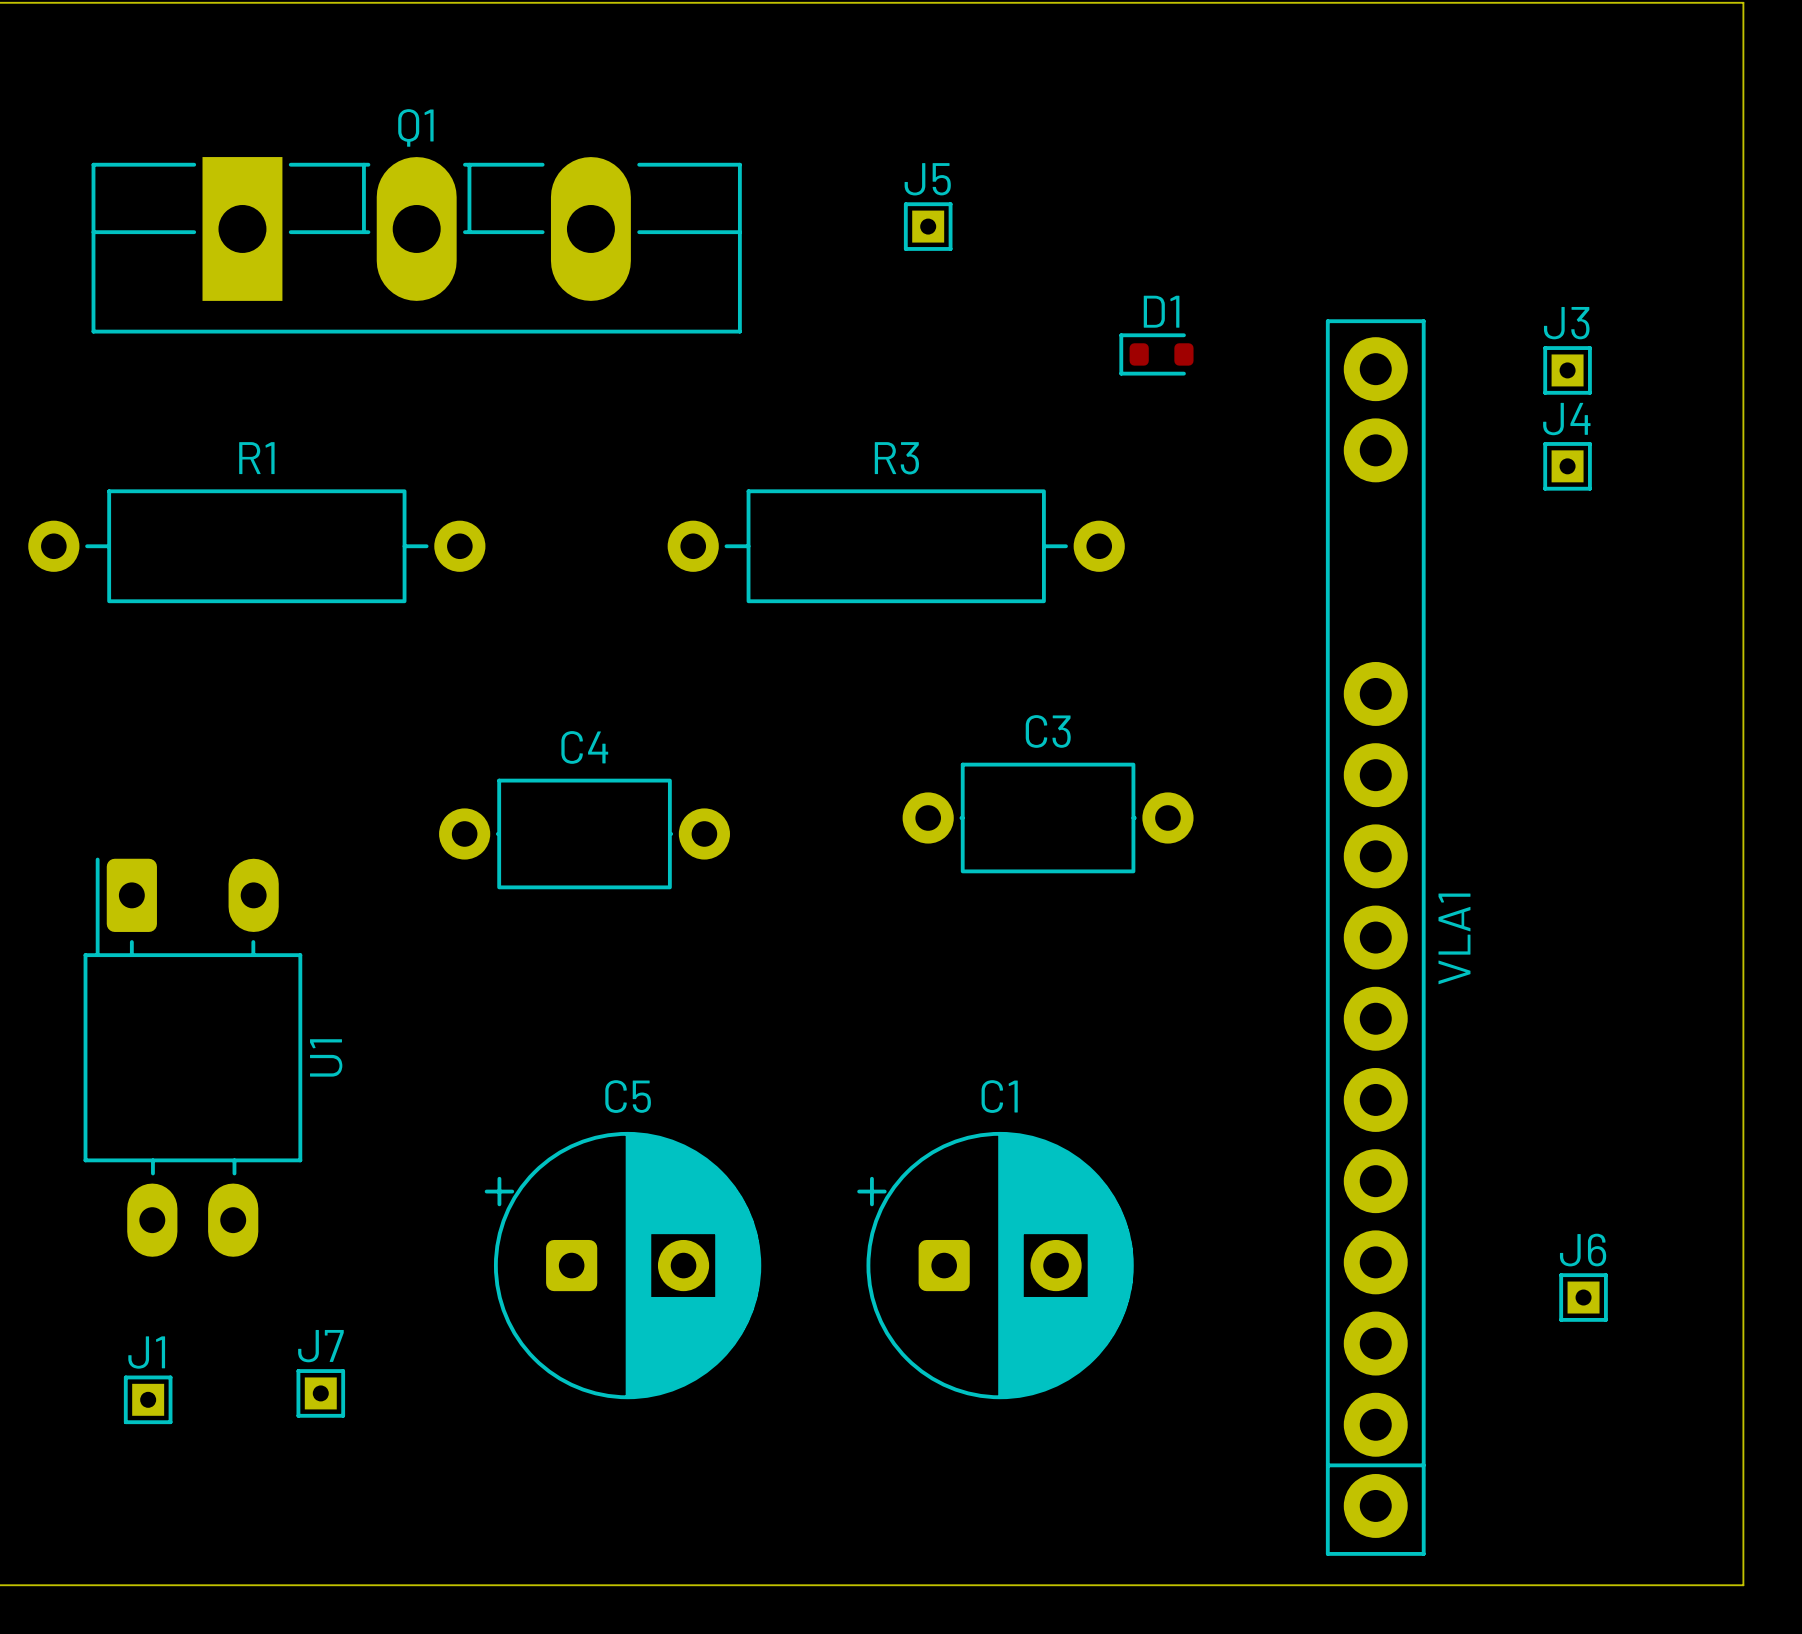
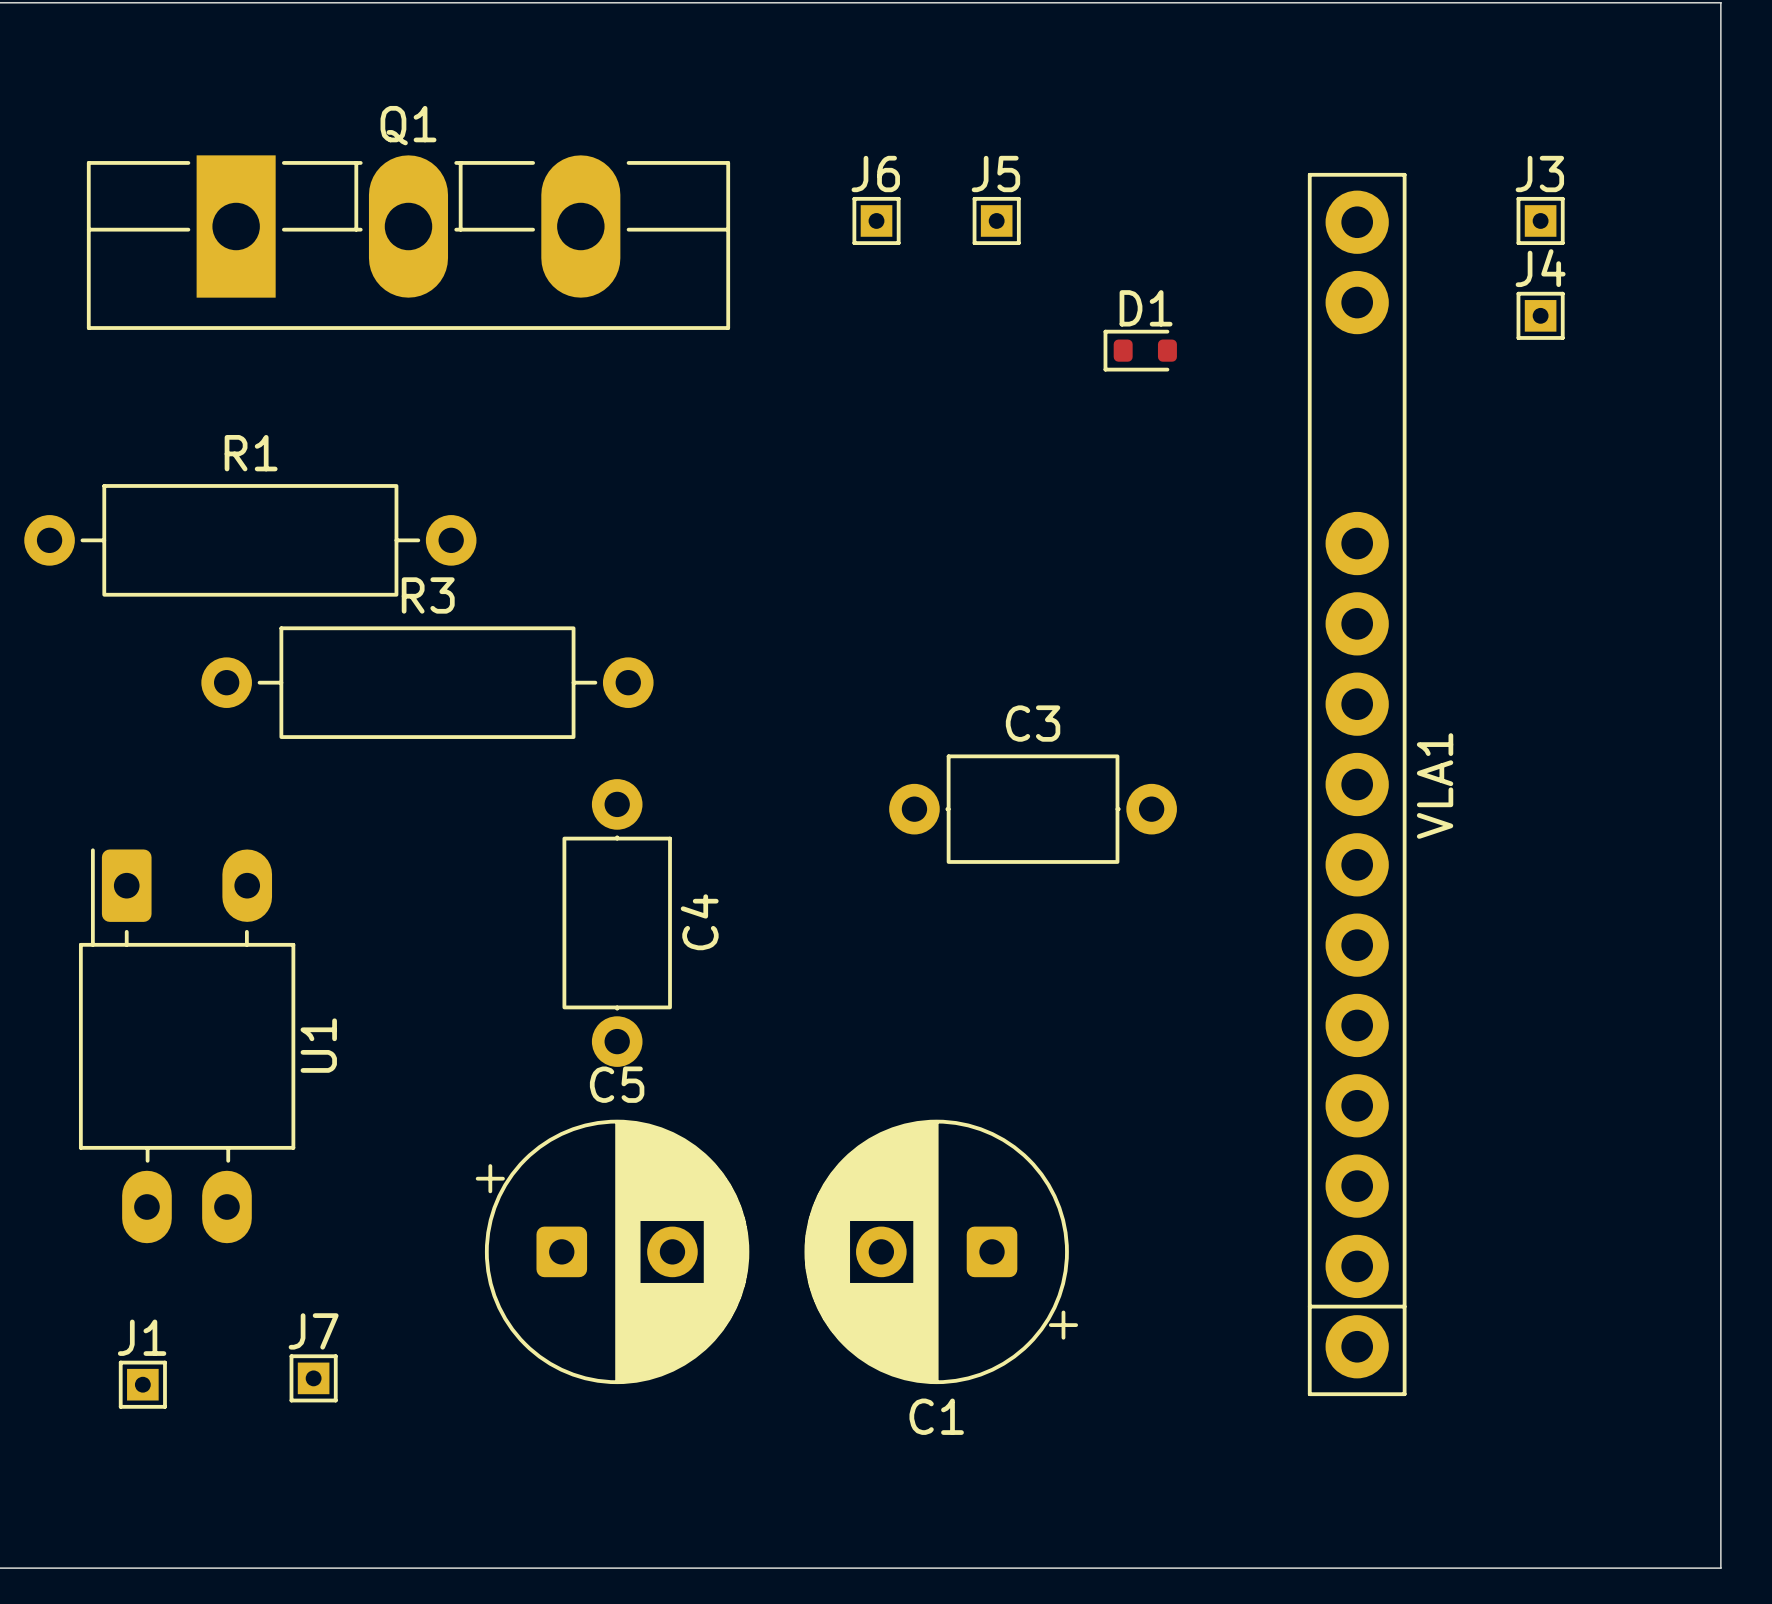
J5 position: (928, 226) -> (996, 220)
J3 position: (1567, 370) -> (1540, 220)
J4 position: (1567, 466) -> (1540, 315)
R3 position: (896, 546) -> (427, 682)
C4 rotation: 0° (584, 833) -> 90° clockwise (617, 923)
VLA1 position: (1375, 937) -> (1357, 784)
C1 rotation: 0° (995, 1265) -> 180° (941, 1251)
J6 position: (1583, 1297) -> (876, 220)

